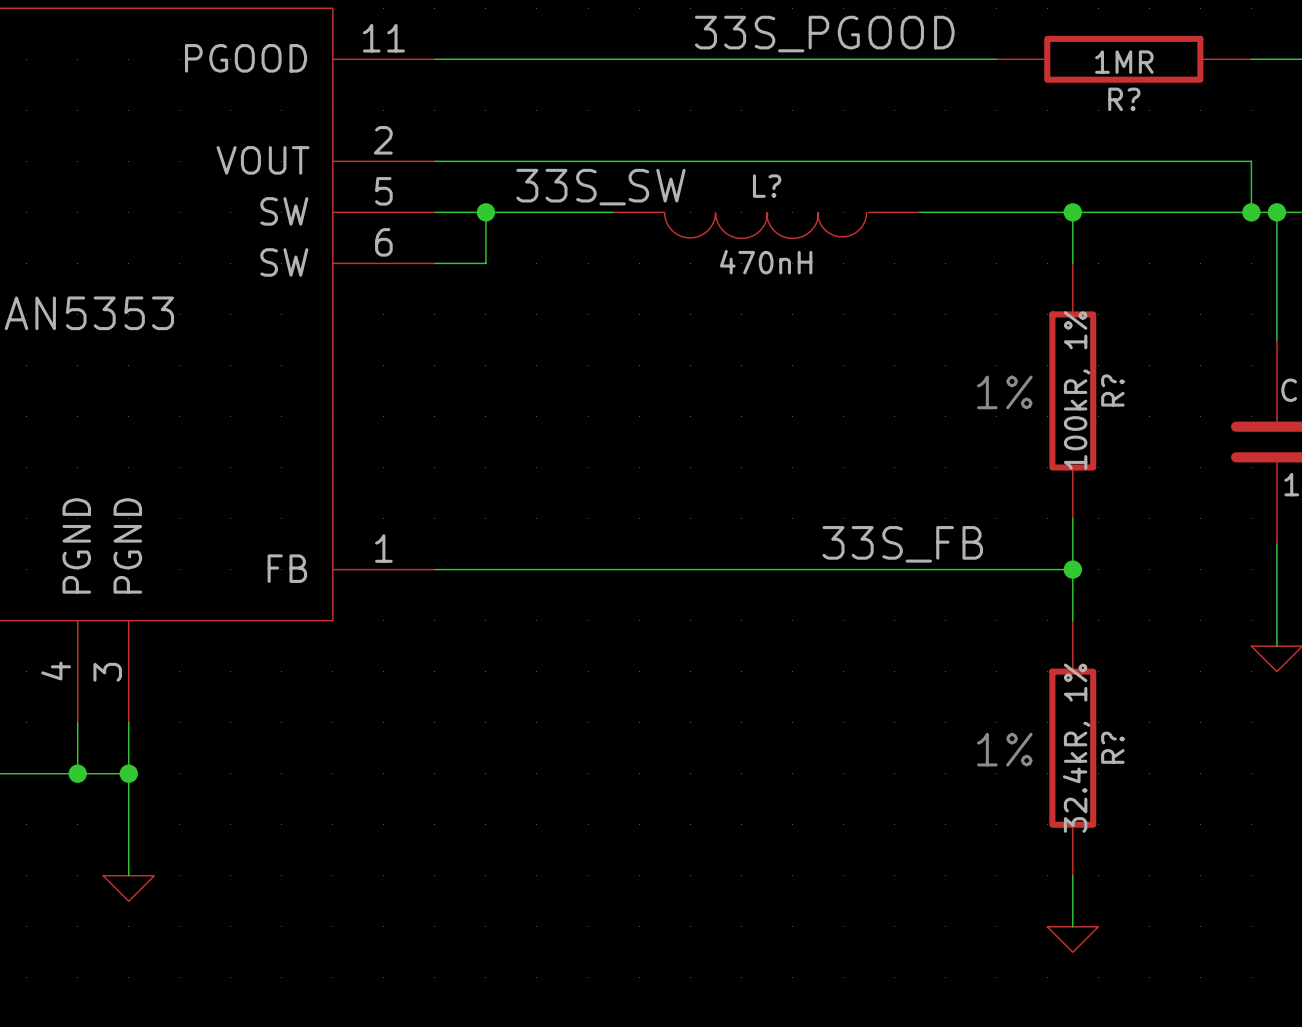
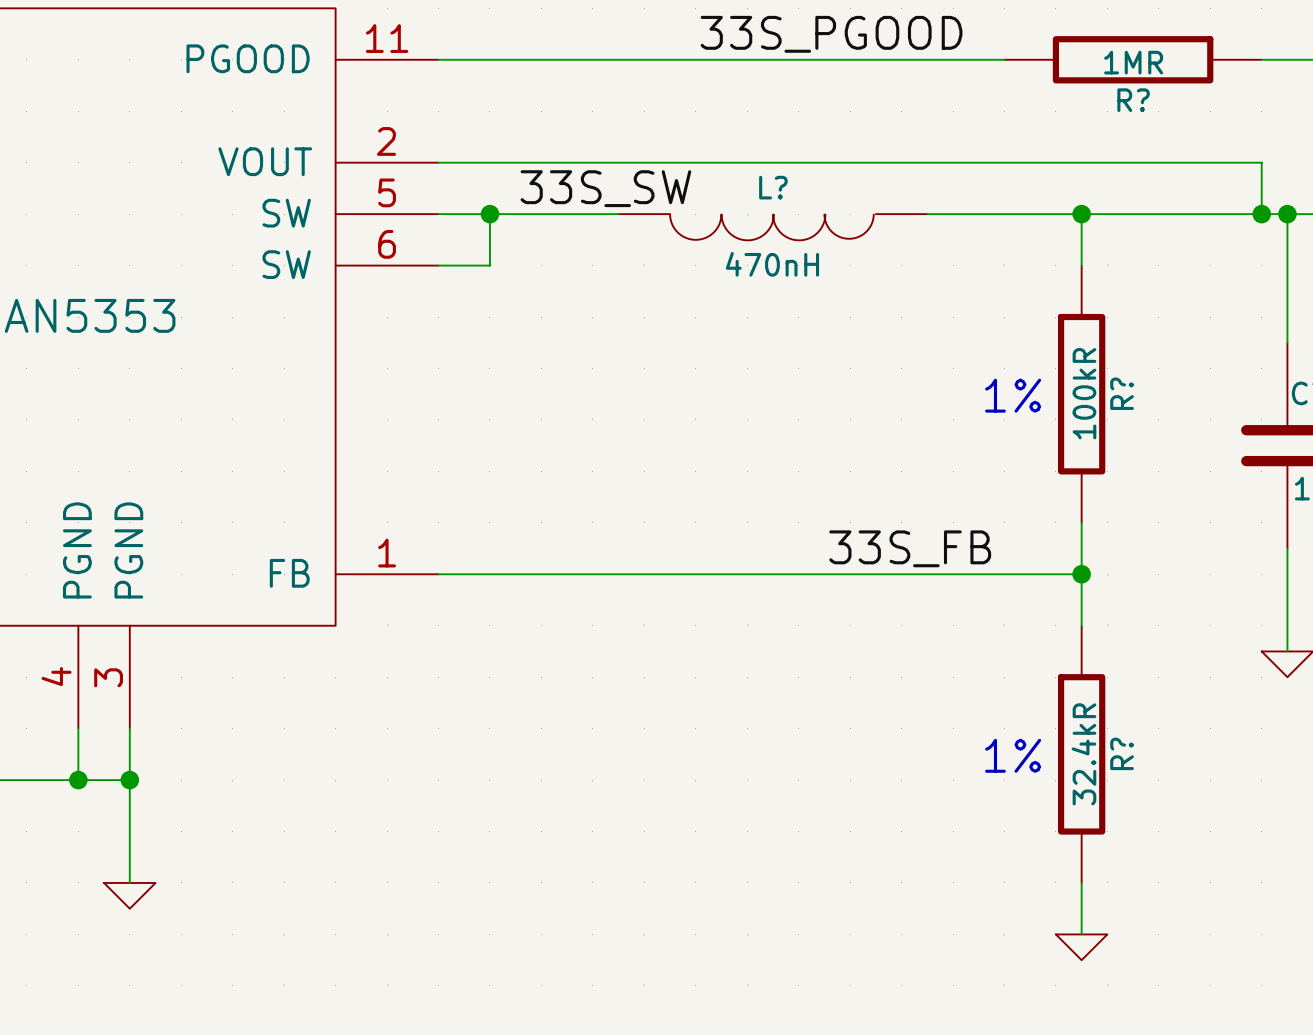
R? value: 100kR, 1% (1077, 390) -> 100kR (1084, 393)
R? value: 32.4kR, 1% (1076, 748) -> 32.4kR (1083, 754)

